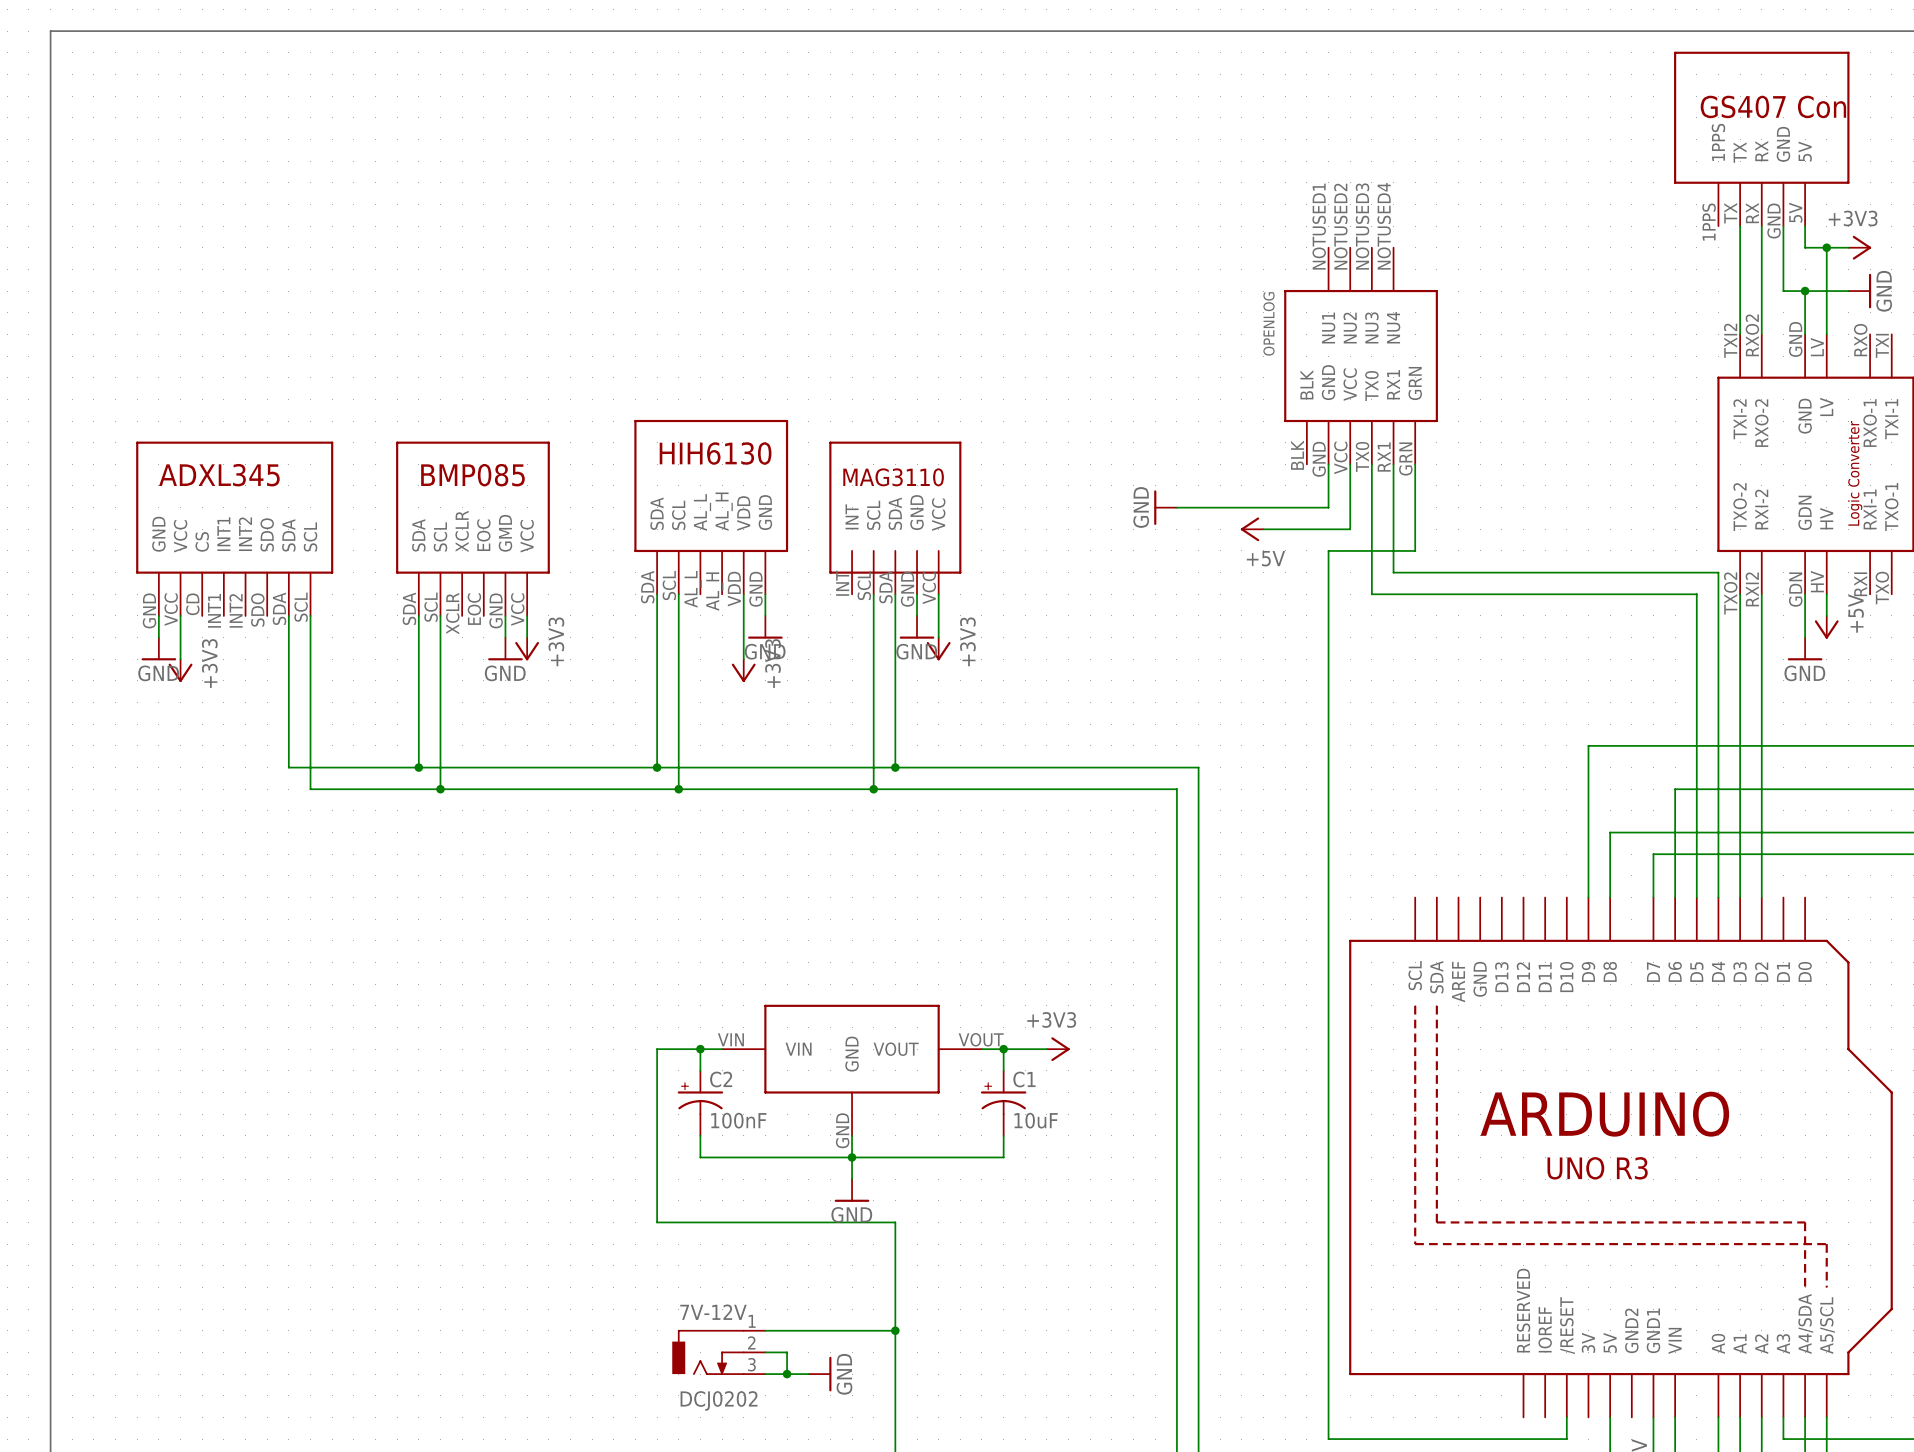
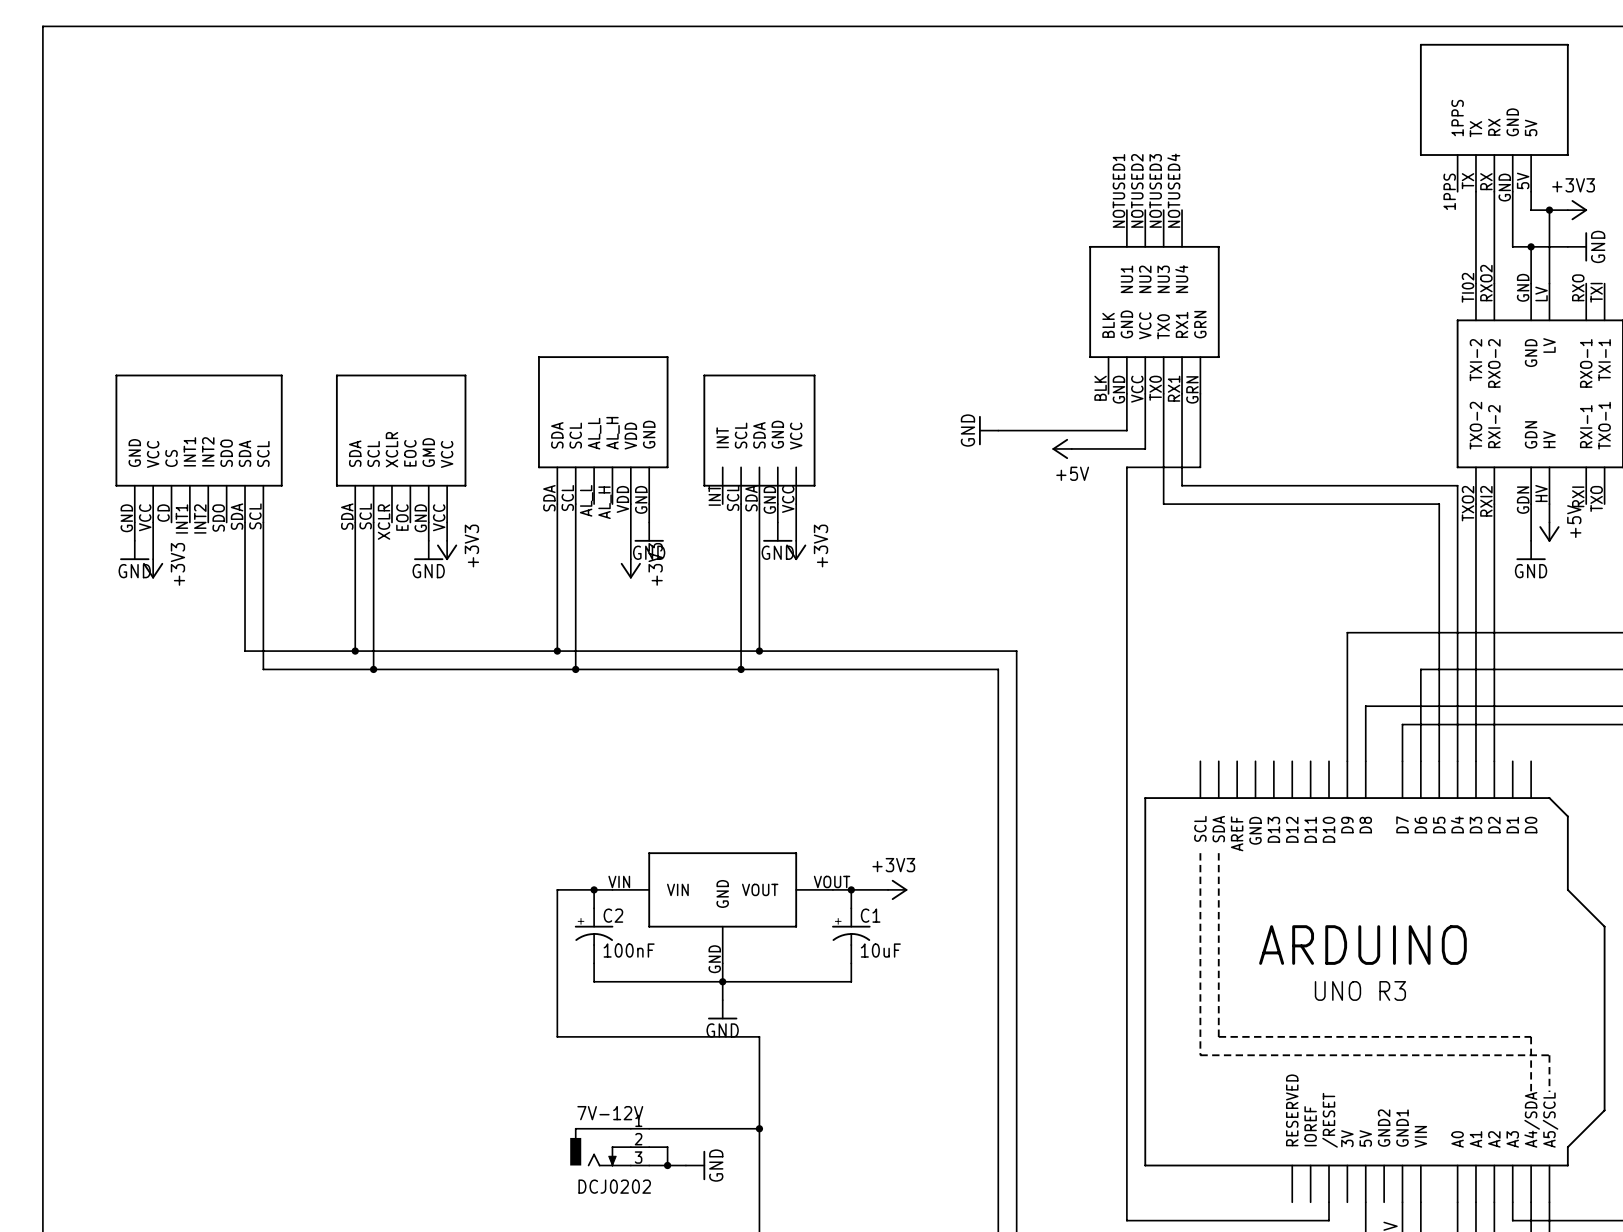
part text: GS407 Con (1773, 106) -> none
part text: OPENLOG (1269, 323) -> none
part pin number: TXI2 (1730, 340) -> TI02 (1468, 287)
part text: HIH6130 (715, 453) -> none
part text: Logic Converter (1855, 473) -> none
part text: ADXL345 (219, 475) -> none
part text: BMP085 (472, 475) -> none
part text: MAG3110 (893, 477) -> none

